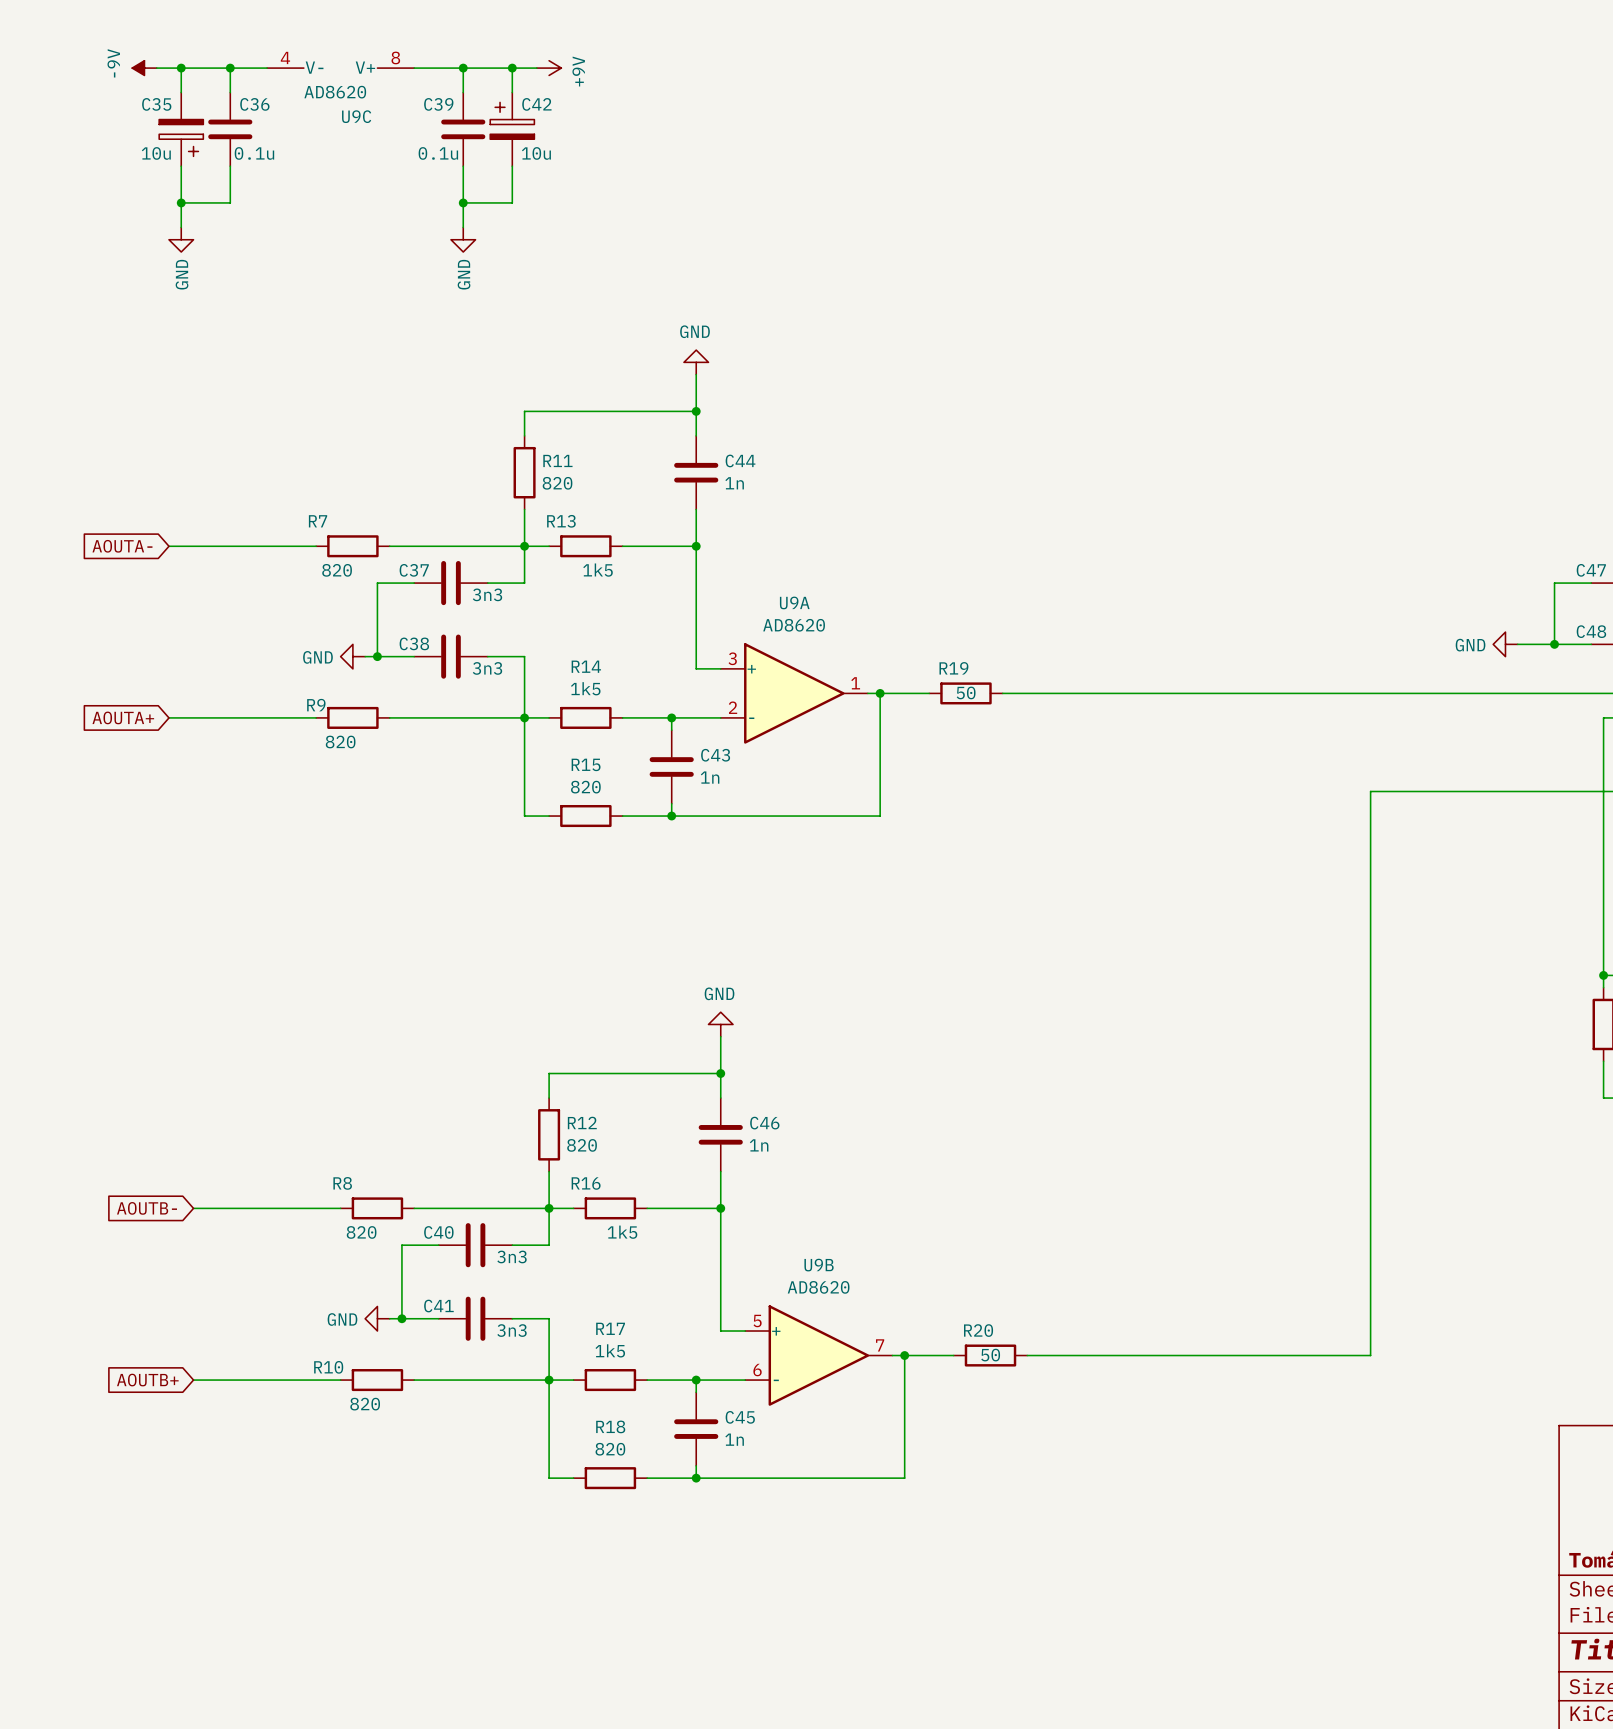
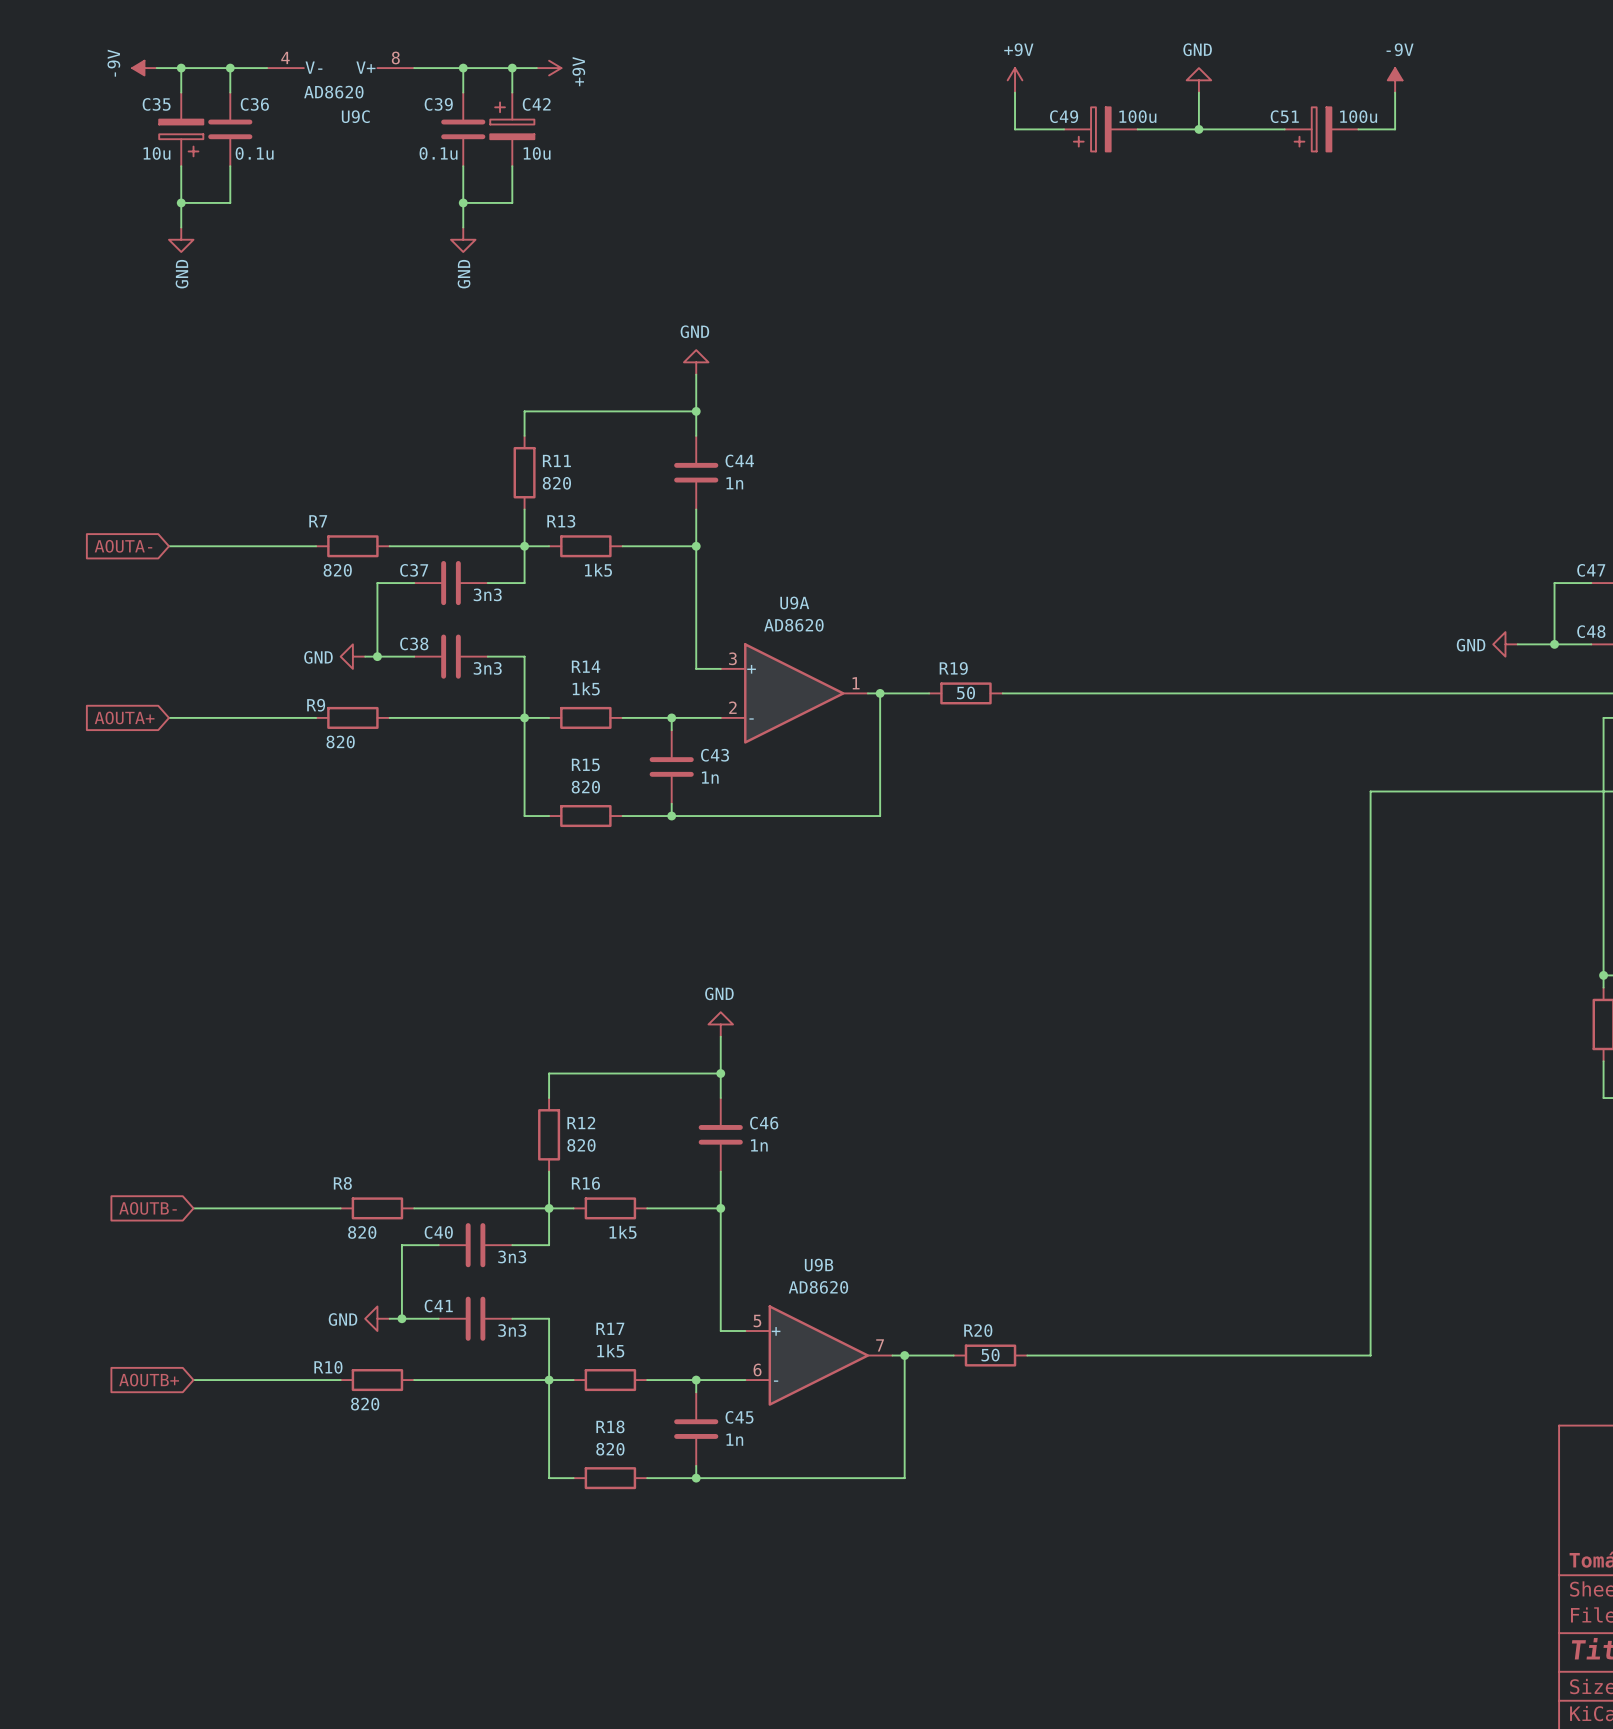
power symbol: none -> +9V (1015, 80)
power symbol: none -> GND (1198, 80)
power symbol: none -> -9V (1395, 80)
wire: none -> (1015, 92) (1015, 129) (1064, 129)
wire: none -> (1198, 92) (1198, 129)
wire: none -> (1395, 92) (1395, 129) (1358, 129)
C49: none -> 100u (1100, 129)
wire: none -> (1137, 129) (1284, 129)
junction: none -> (1198, 129)
C51: none -> 100u (1321, 129)

